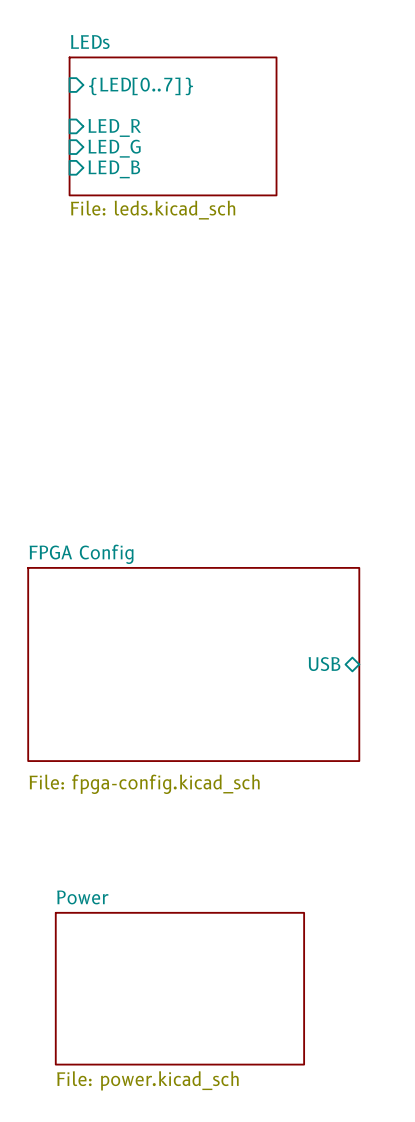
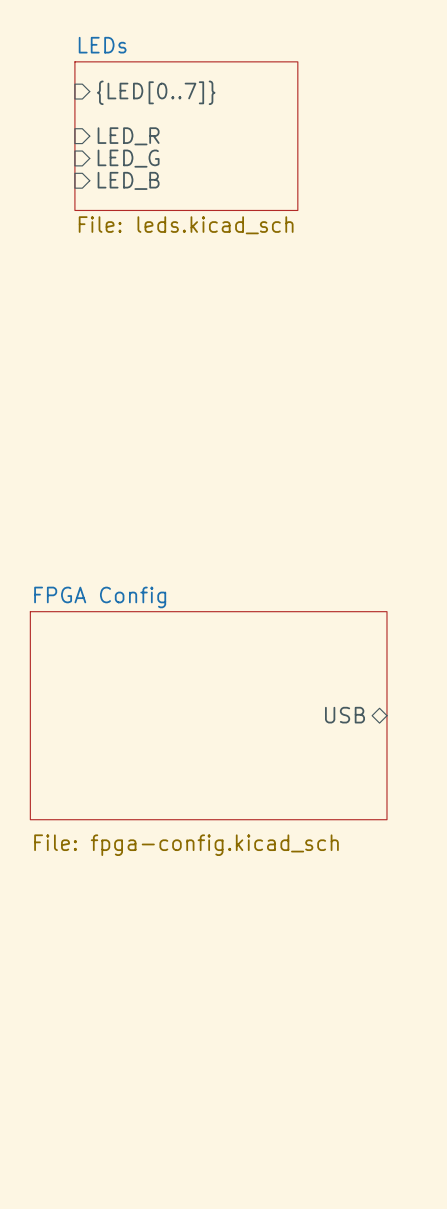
sheet Power: File: power.kicad_sch (179, 988) -> none

